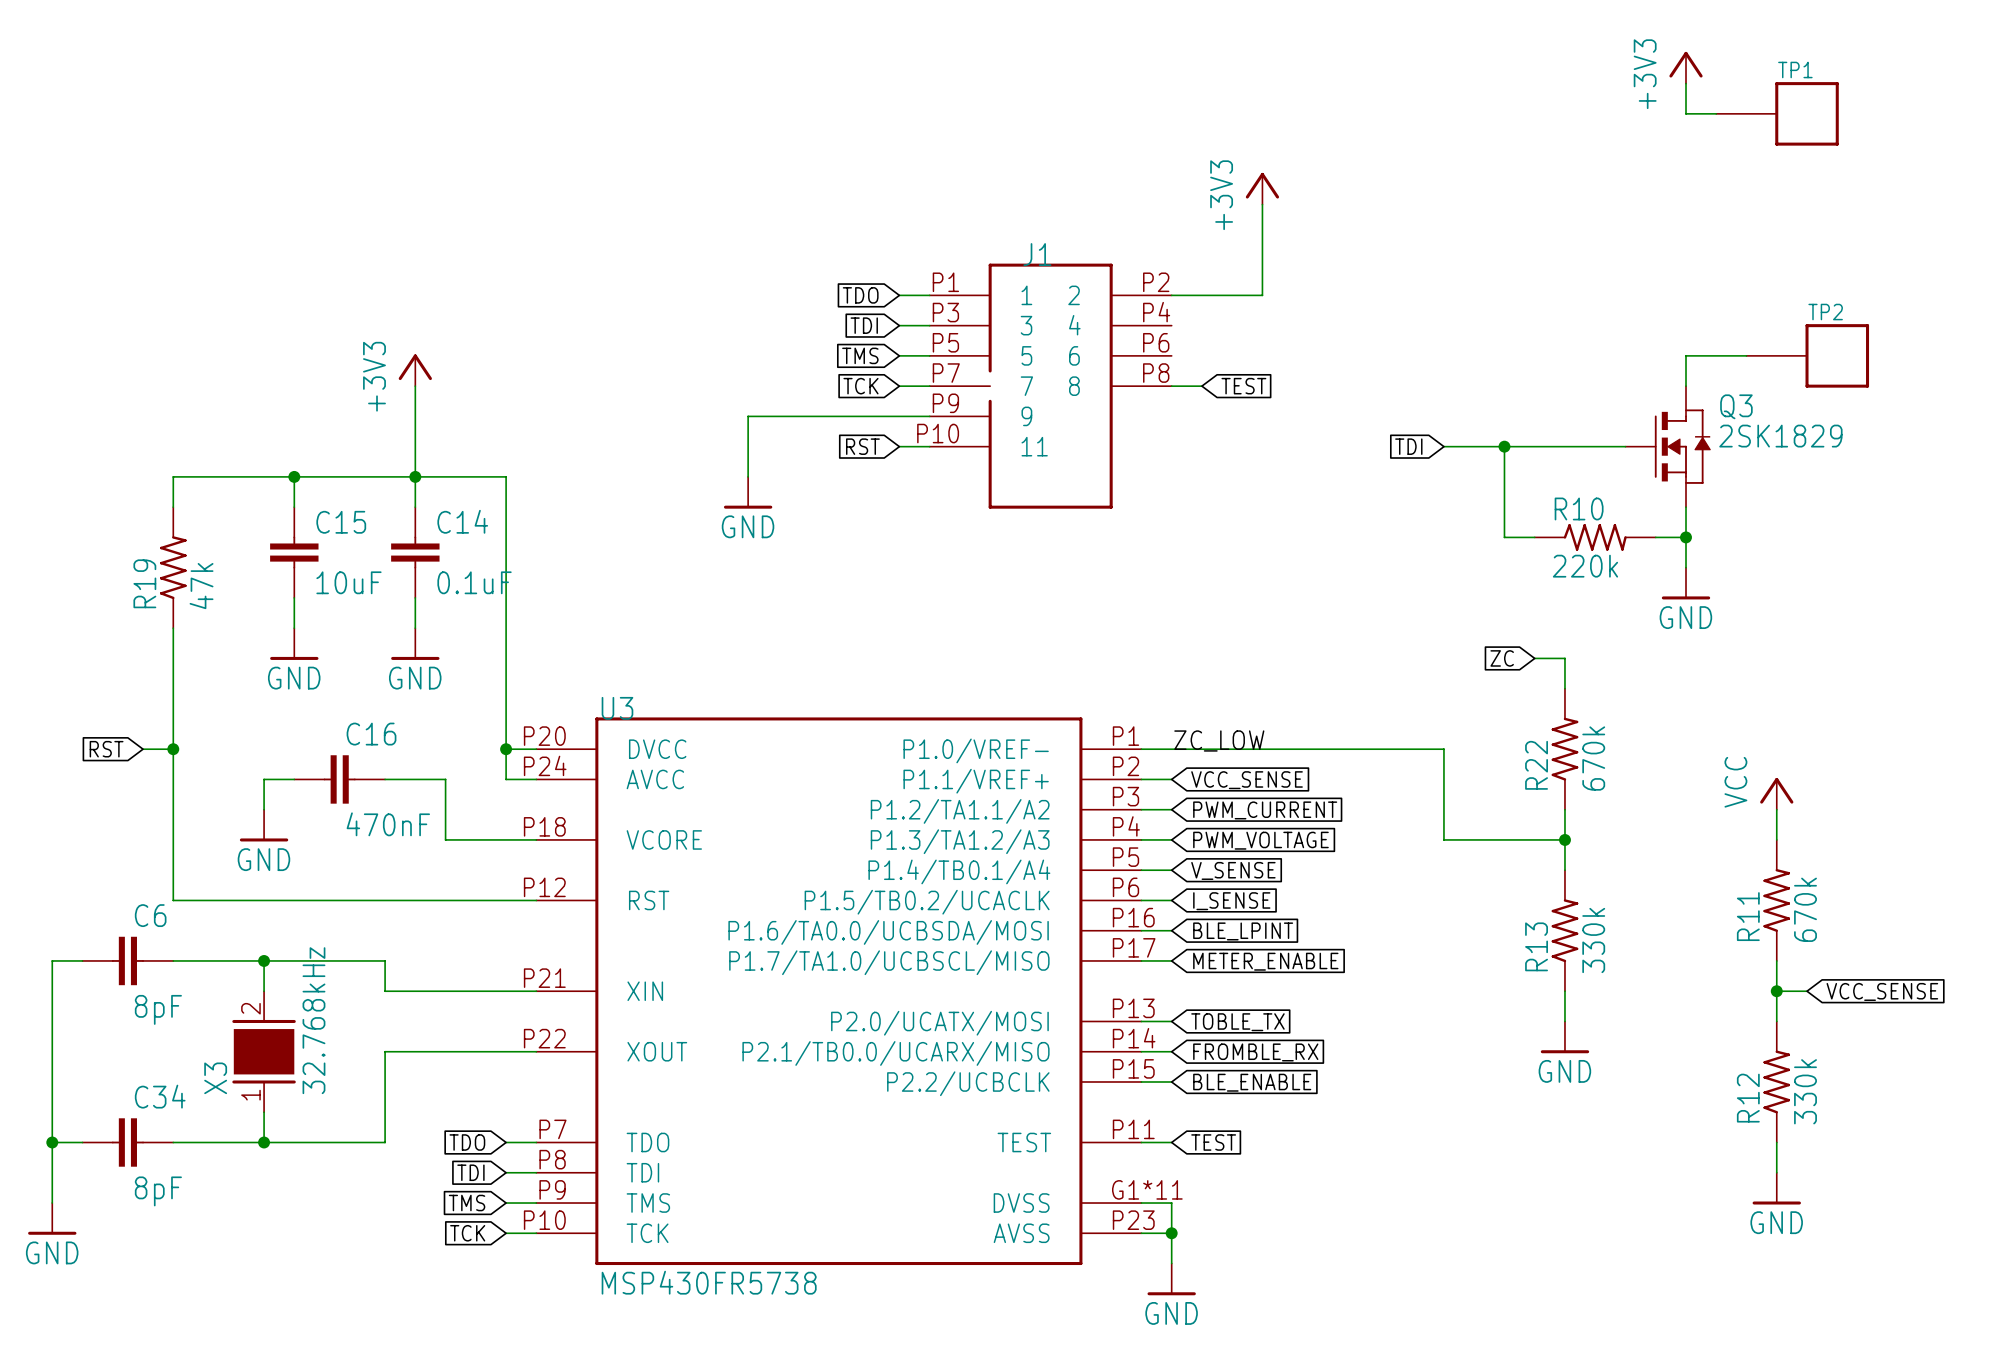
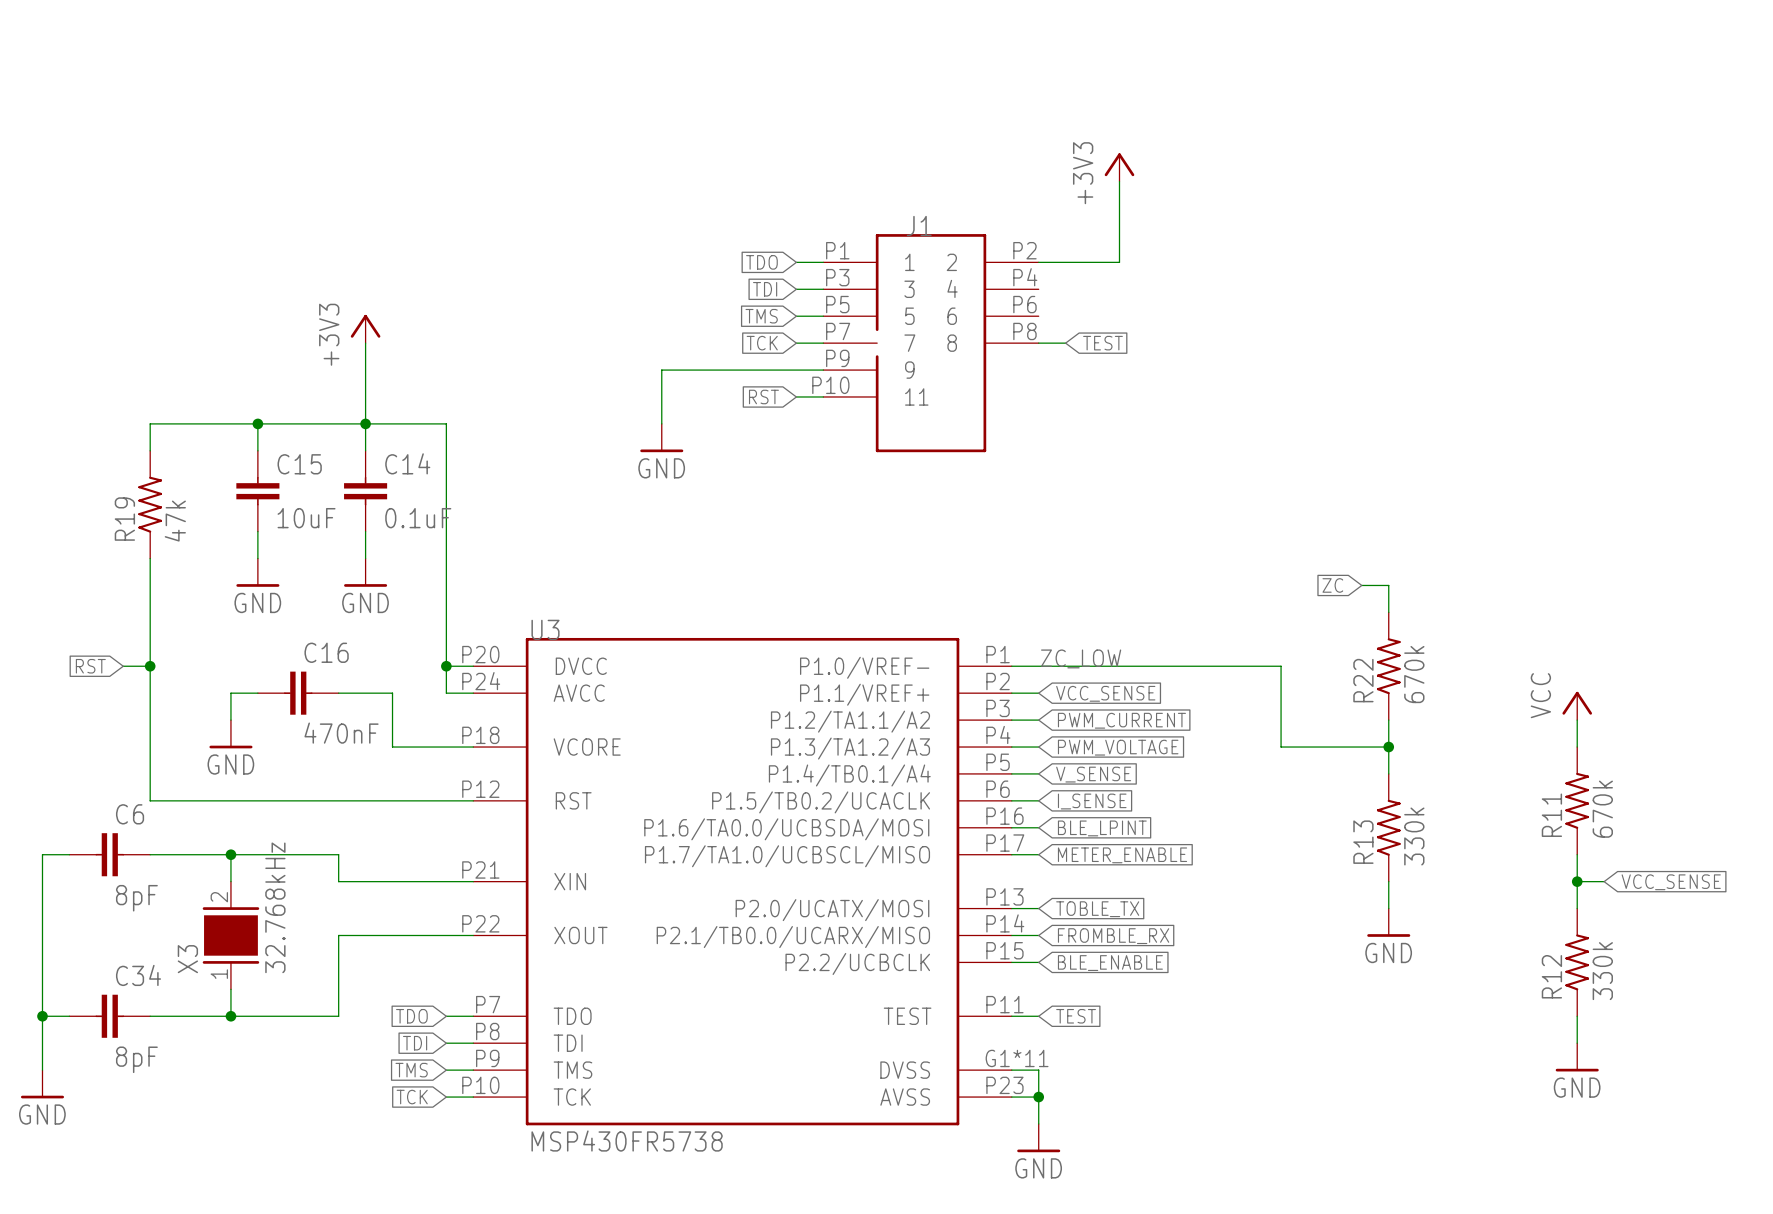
power symbol: +3V3 (1686, 67) -> none
wire: (1686, 83) (1686, 113) (1716, 113) -> none
TP1: (1777, 113) -> none
wire: (1746, 355) (1686, 355) (1686, 386) -> none
TP2: (1807, 355) -> none
global label: TDI (1408, 446) -> none
wire: (1443, 446) (1625, 446) -> none
wire: (1504, 446) (1504, 537) (1534, 537) -> none
junction: (1504, 446) -> none
Q3: 2SK1829 (1668, 446) -> none
wire: (1686, 507) (1686, 567) -> none
R10: 220k (1595, 537) -> none
wire: (1655, 537) (1686, 537) -> none
junction: (1686, 537) -> none
power symbol: GND (1686, 583) -> none

